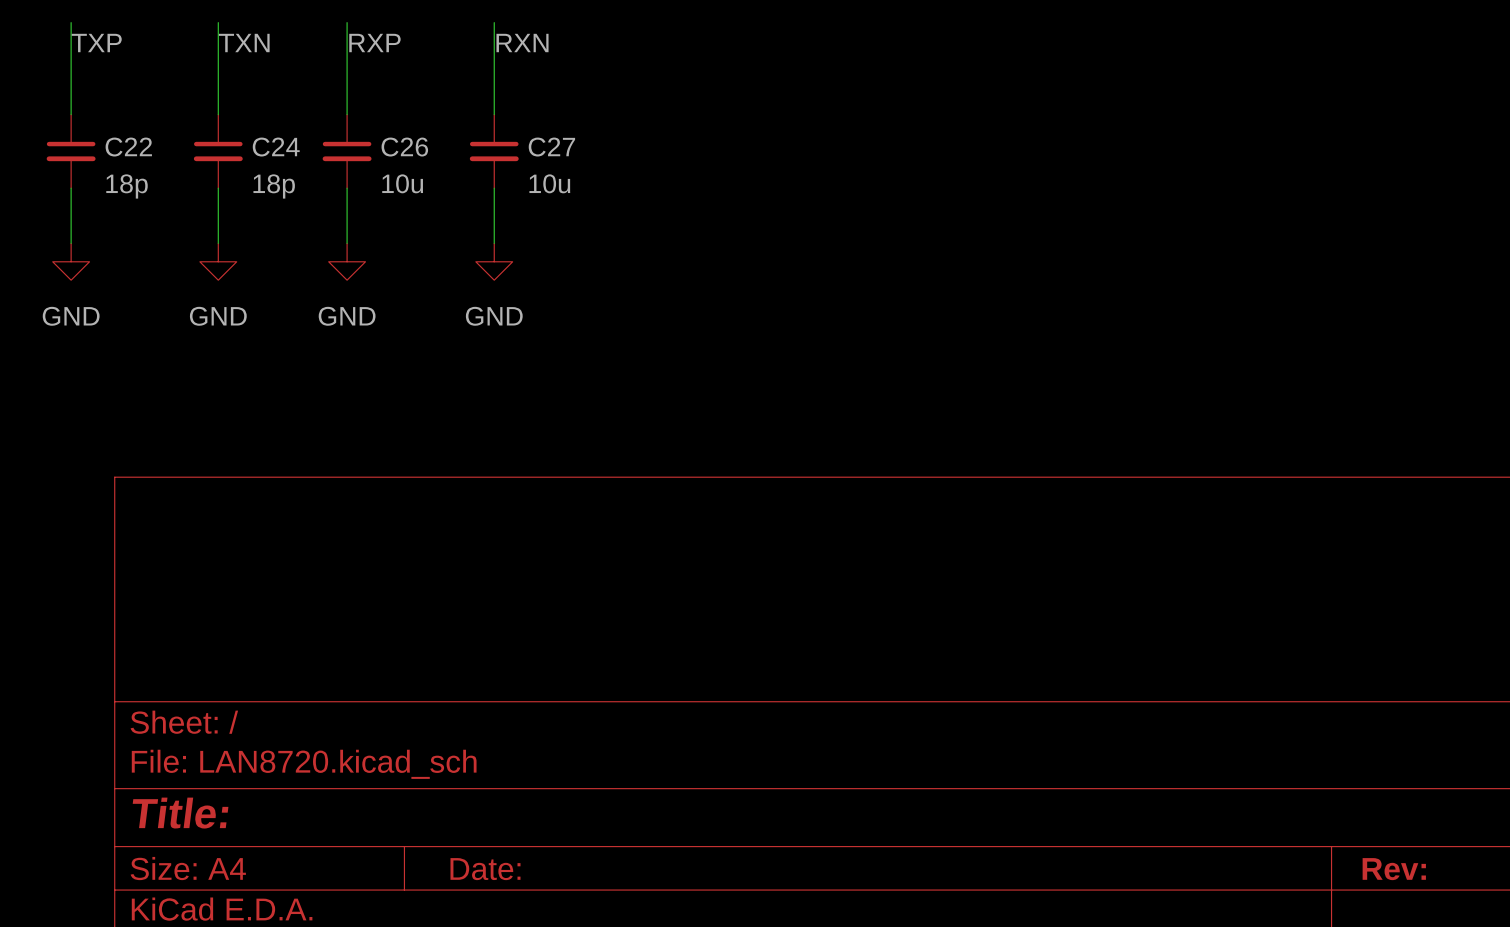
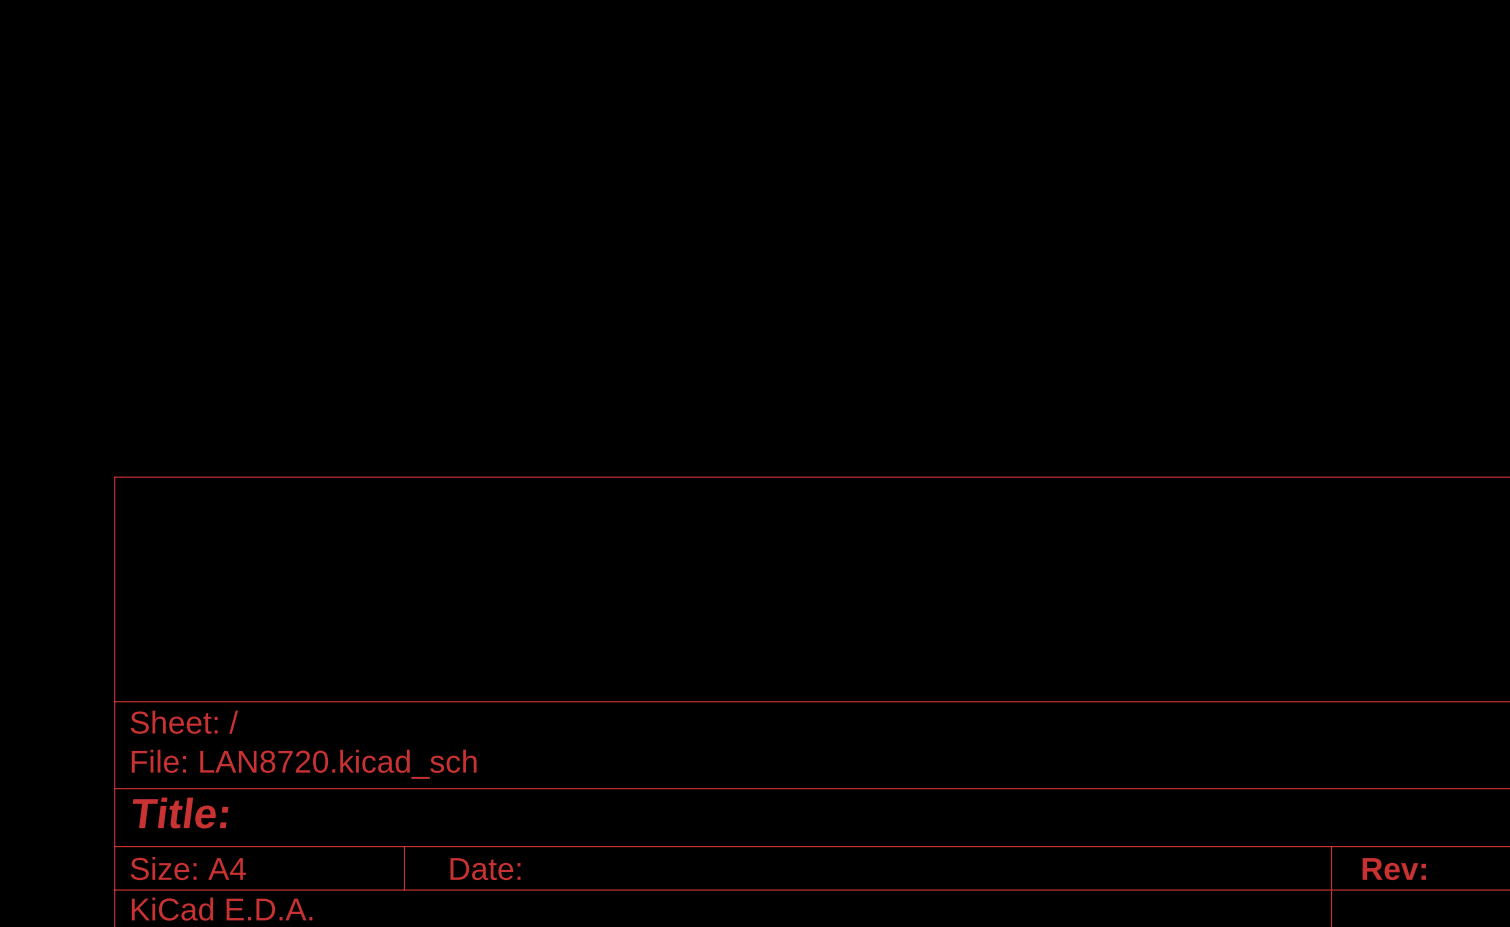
wire: (71, 22) (71, 114) -> none
wire: (218, 22) (218, 114) -> none
wire: (347, 22) (347, 114) -> none
wire: (494, 22) (494, 114) -> none
label: TXP (96, 43) -> none
label: TXN (244, 43) -> none
label: RXP (374, 43) -> none
label: RXN (522, 43) -> none
C22: 18p (71, 151) -> none
C24: 18p (218, 151) -> none
C26: 10u (347, 151) -> none
C27: 10u (494, 151) -> none
wire: (71, 188) (71, 243) -> none
wire: (218, 188) (218, 243) -> none
wire: (347, 188) (347, 243) -> none
wire: (494, 188) (494, 243) -> none
power symbol: GND (71, 261) -> none
power symbol: GND (218, 261) -> none
power symbol: GND (347, 261) -> none
power symbol: GND (494, 261) -> none

